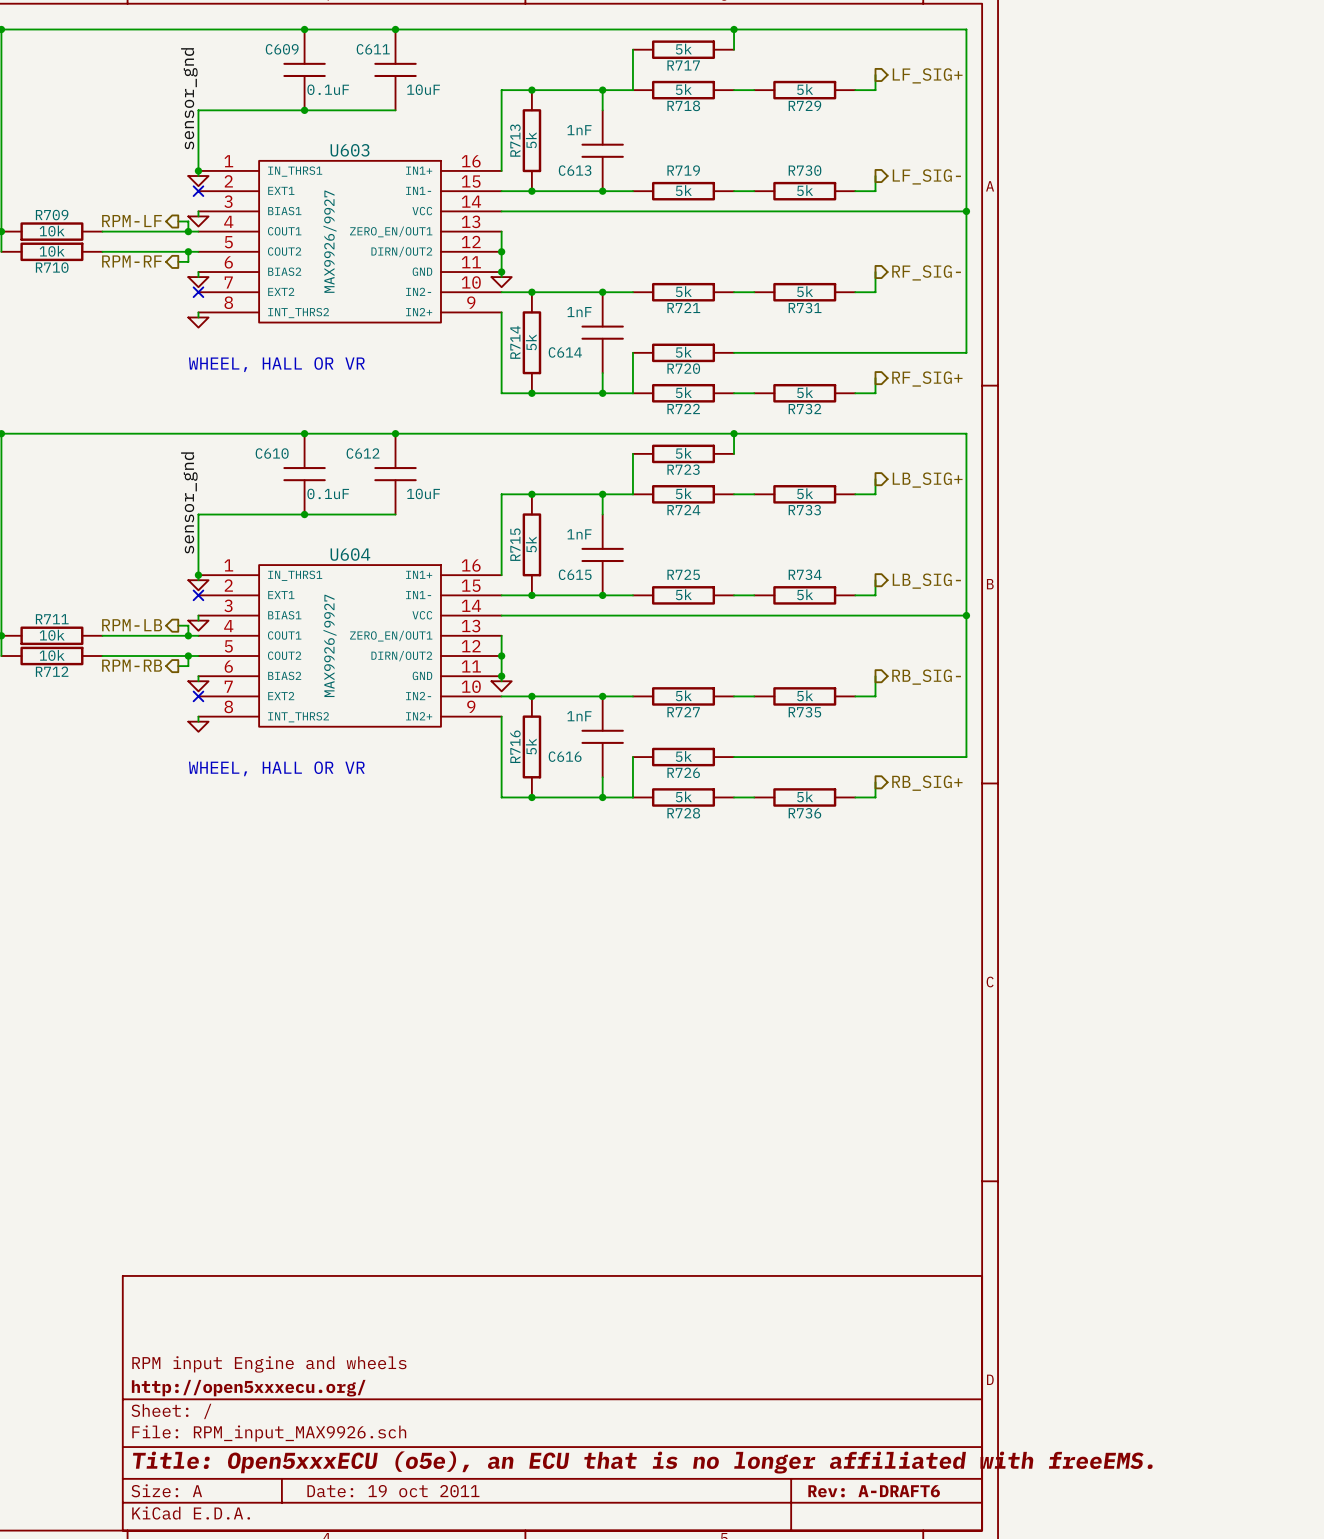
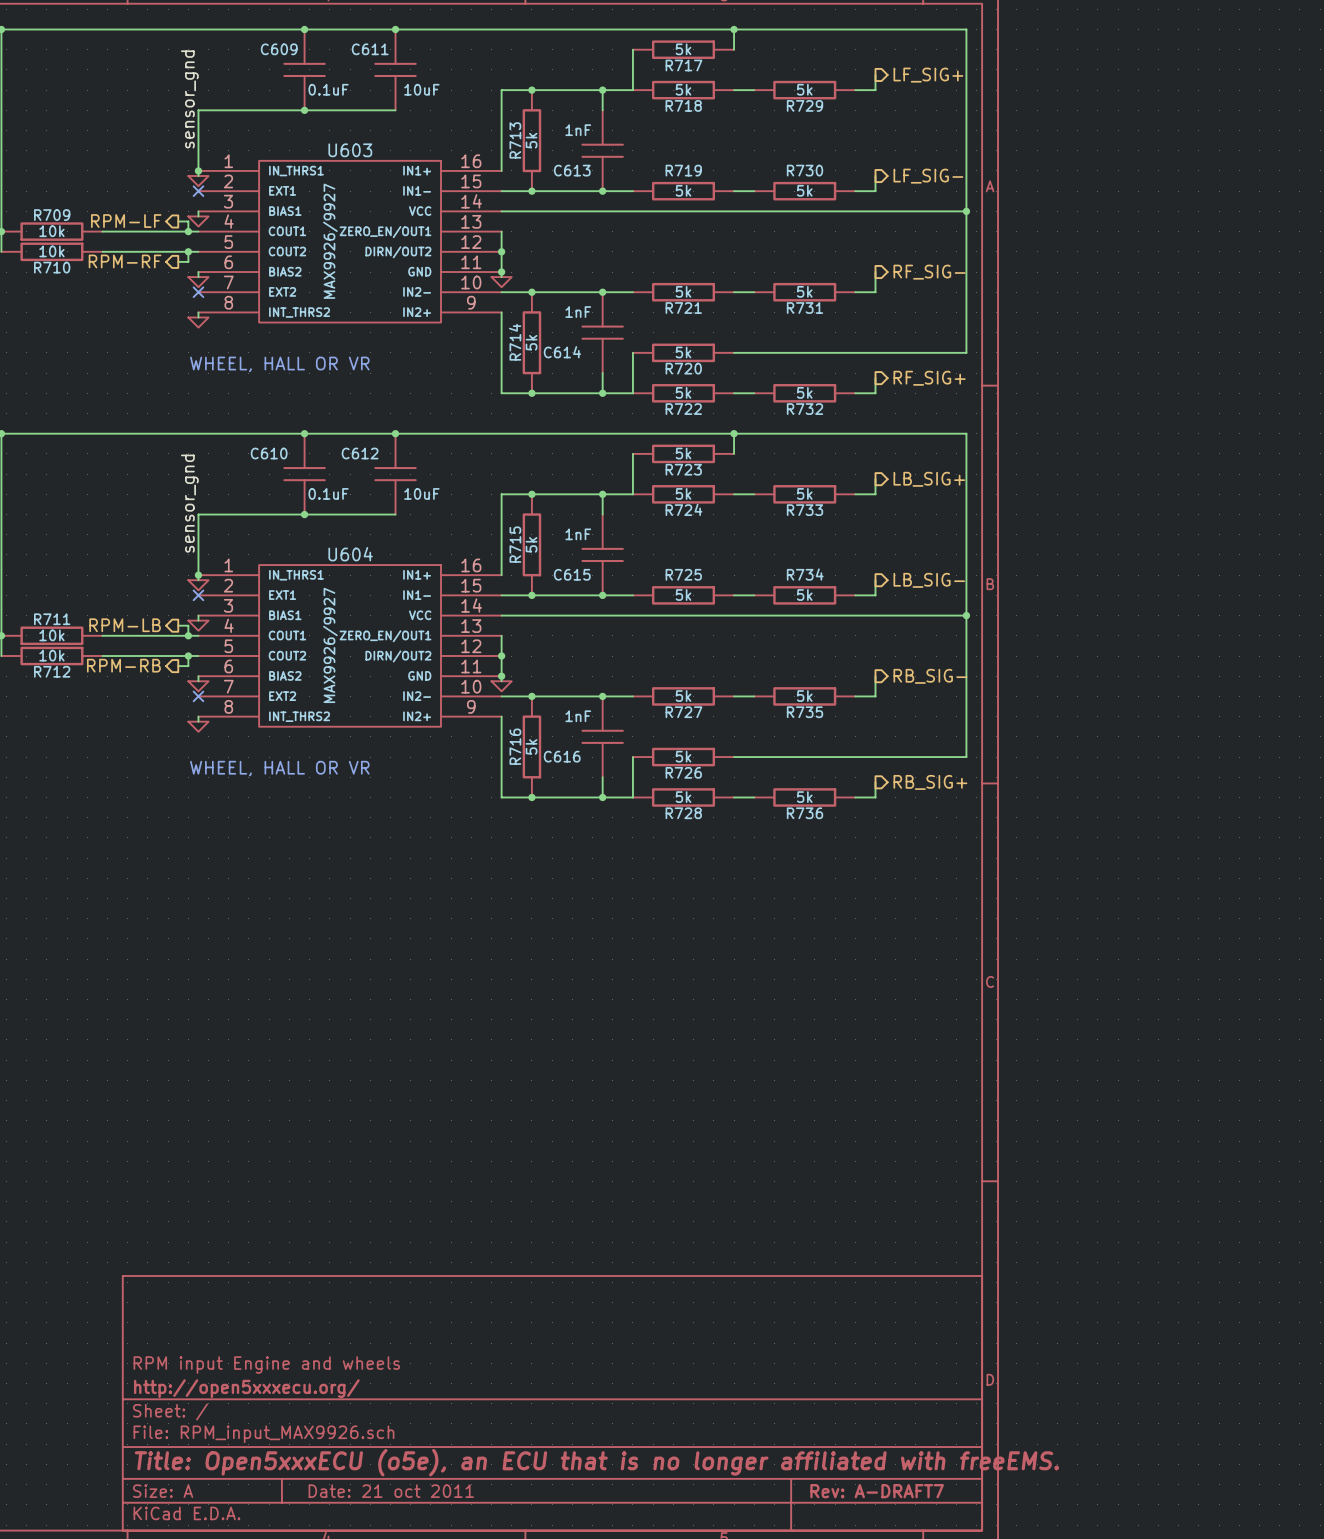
title block: Date: 19 oct 2011 (393, 1491) -> Date: 21 oct 2011 (391, 1491)
title block: Rev: A-DRAFT6 (874, 1491) -> Rev: A-DRAFT7 (877, 1491)

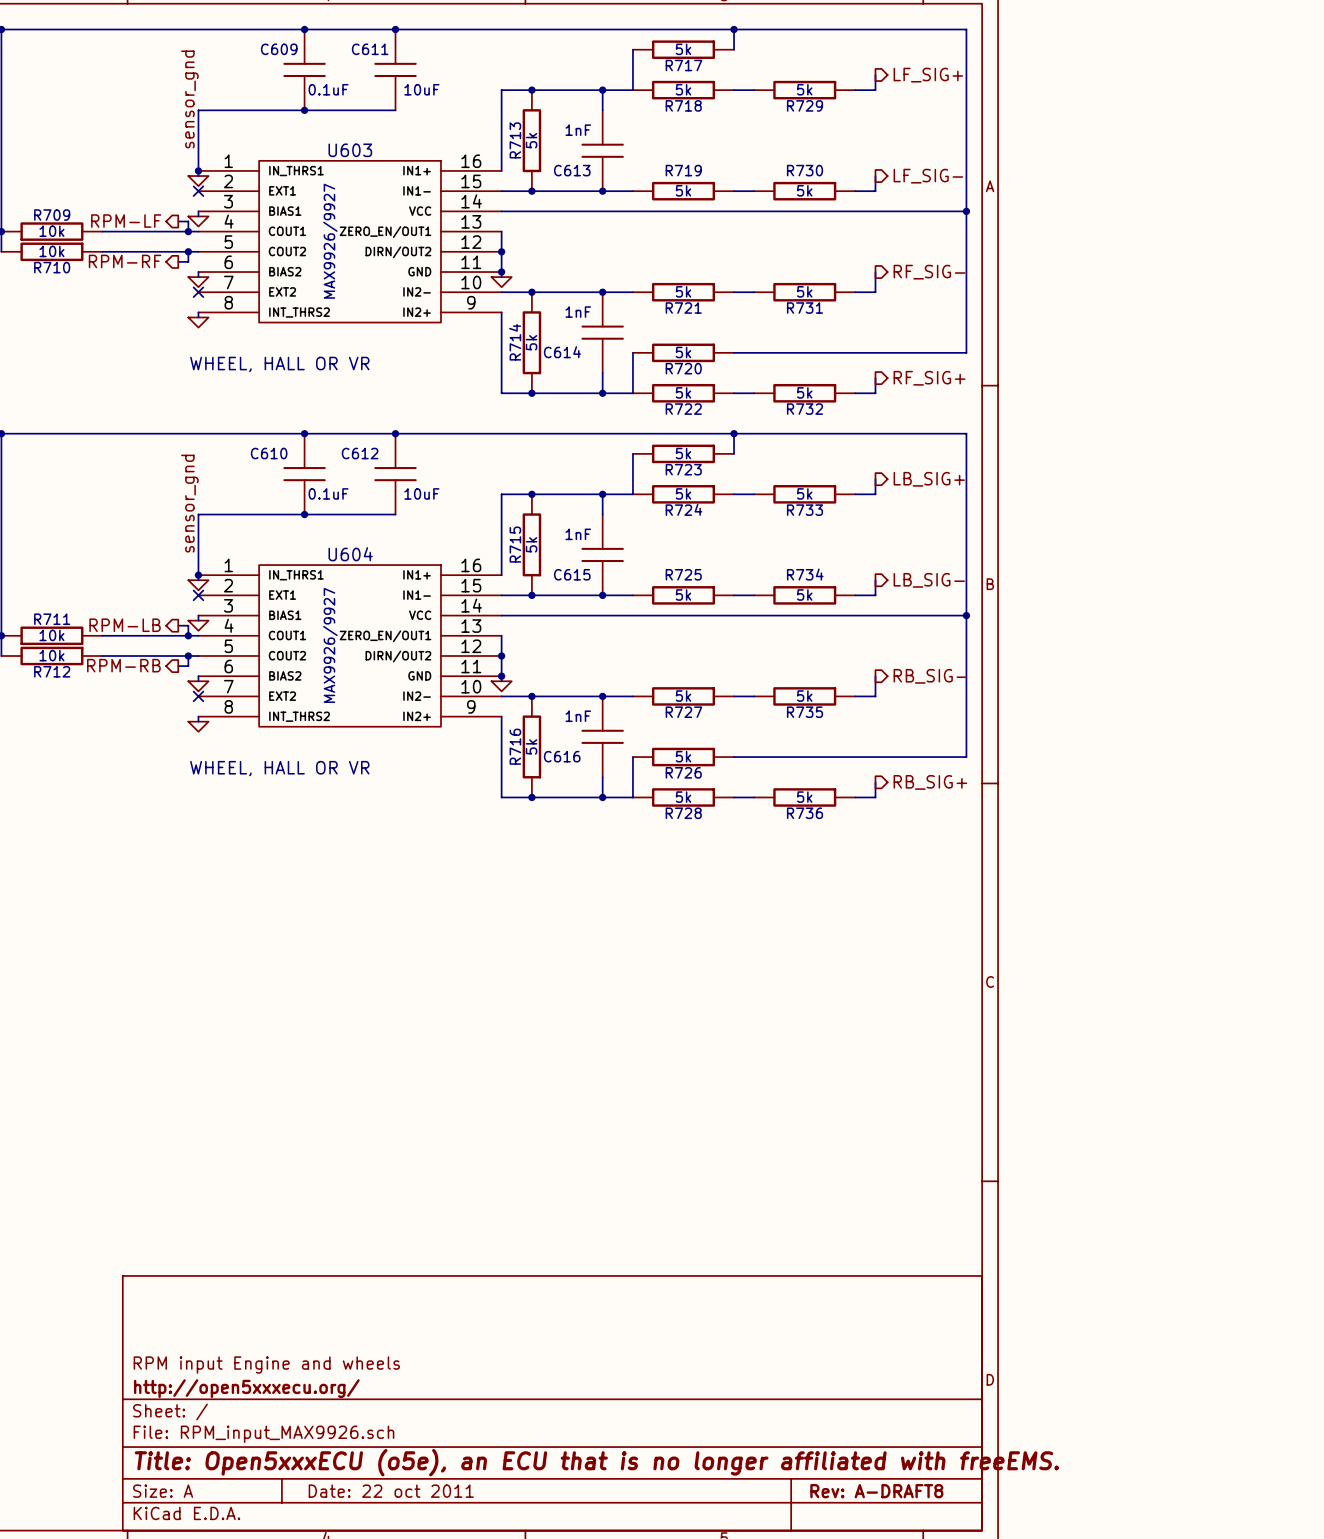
title block: Date: 21 oct 2011 (391, 1491) -> Date: 22 oct 2011 (391, 1491)
title block: Rev: A-DRAFT7 (877, 1491) -> Rev: A-DRAFT8 (876, 1491)

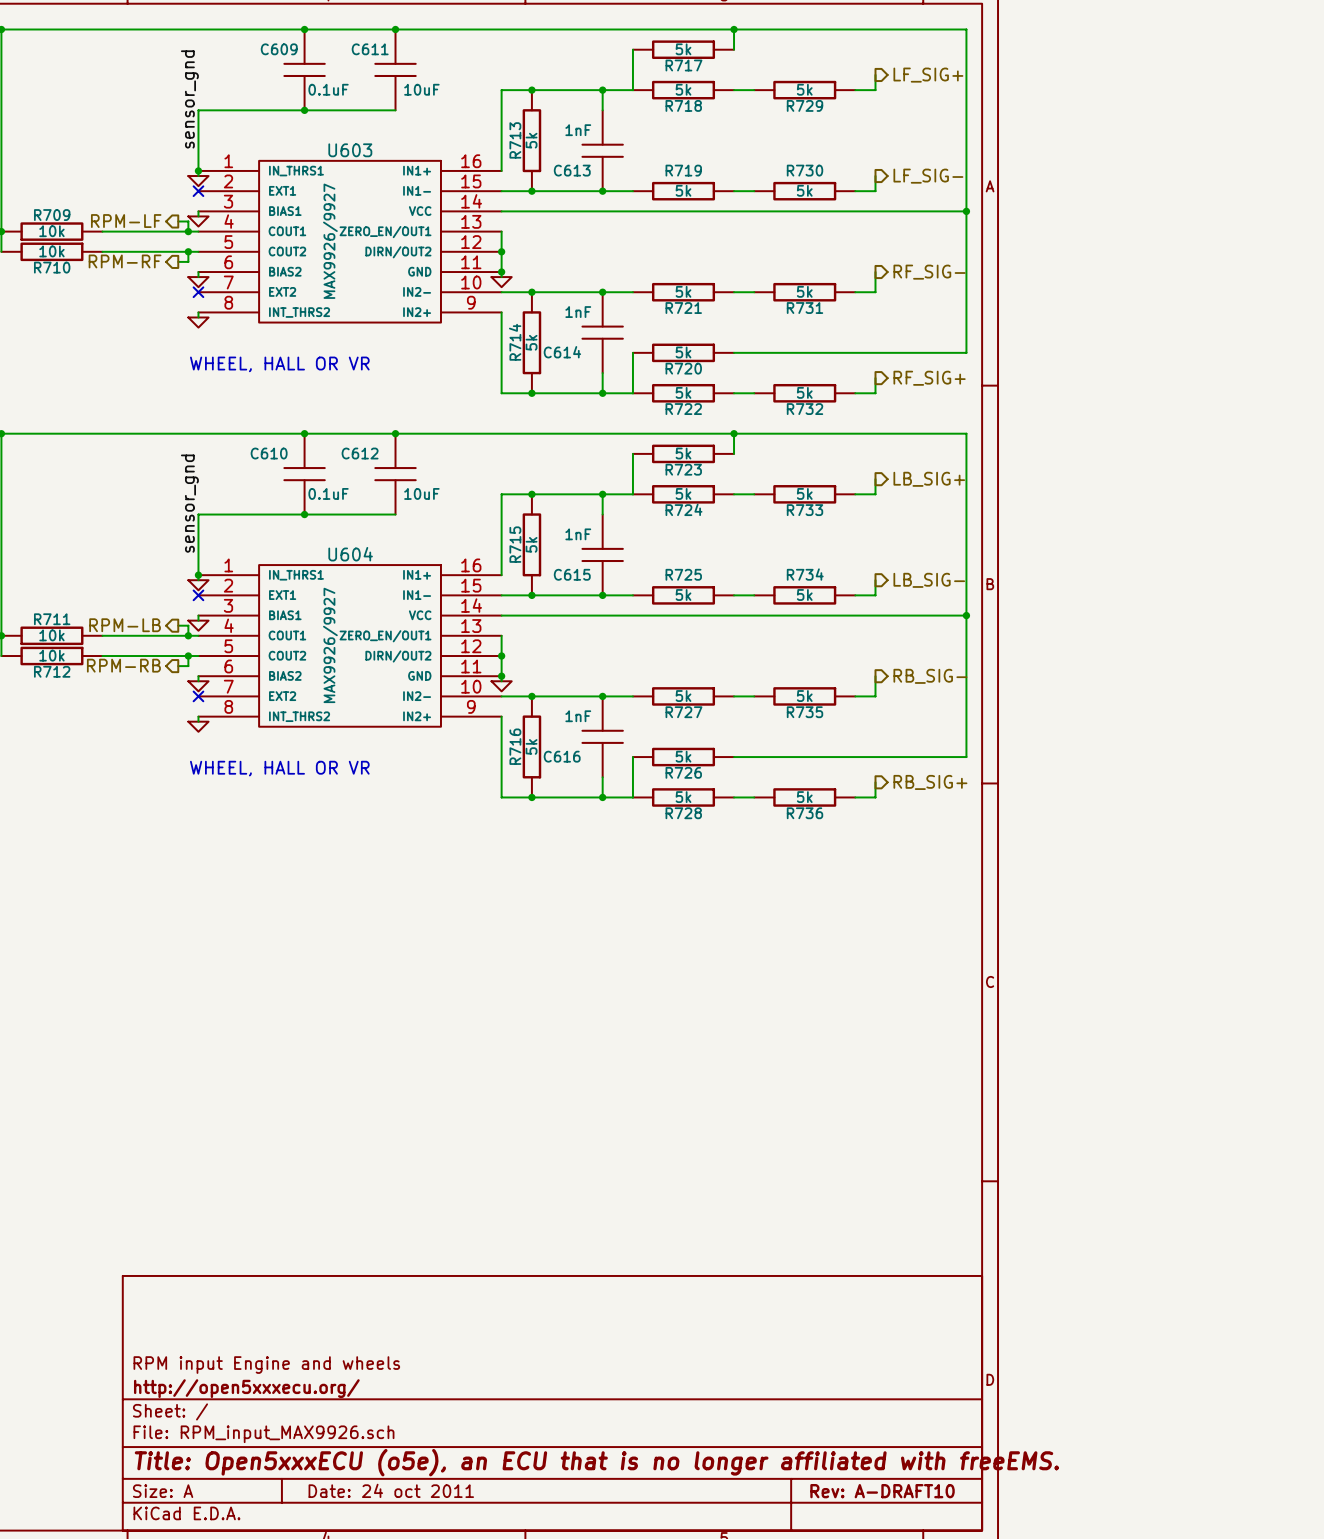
title block: Date: 22 oct 2011 (391, 1491) -> Date: 24 oct 2011 (391, 1490)
title block: Rev: A-DRAFT8 (876, 1491) -> Rev: A-DRAFT10 (882, 1491)

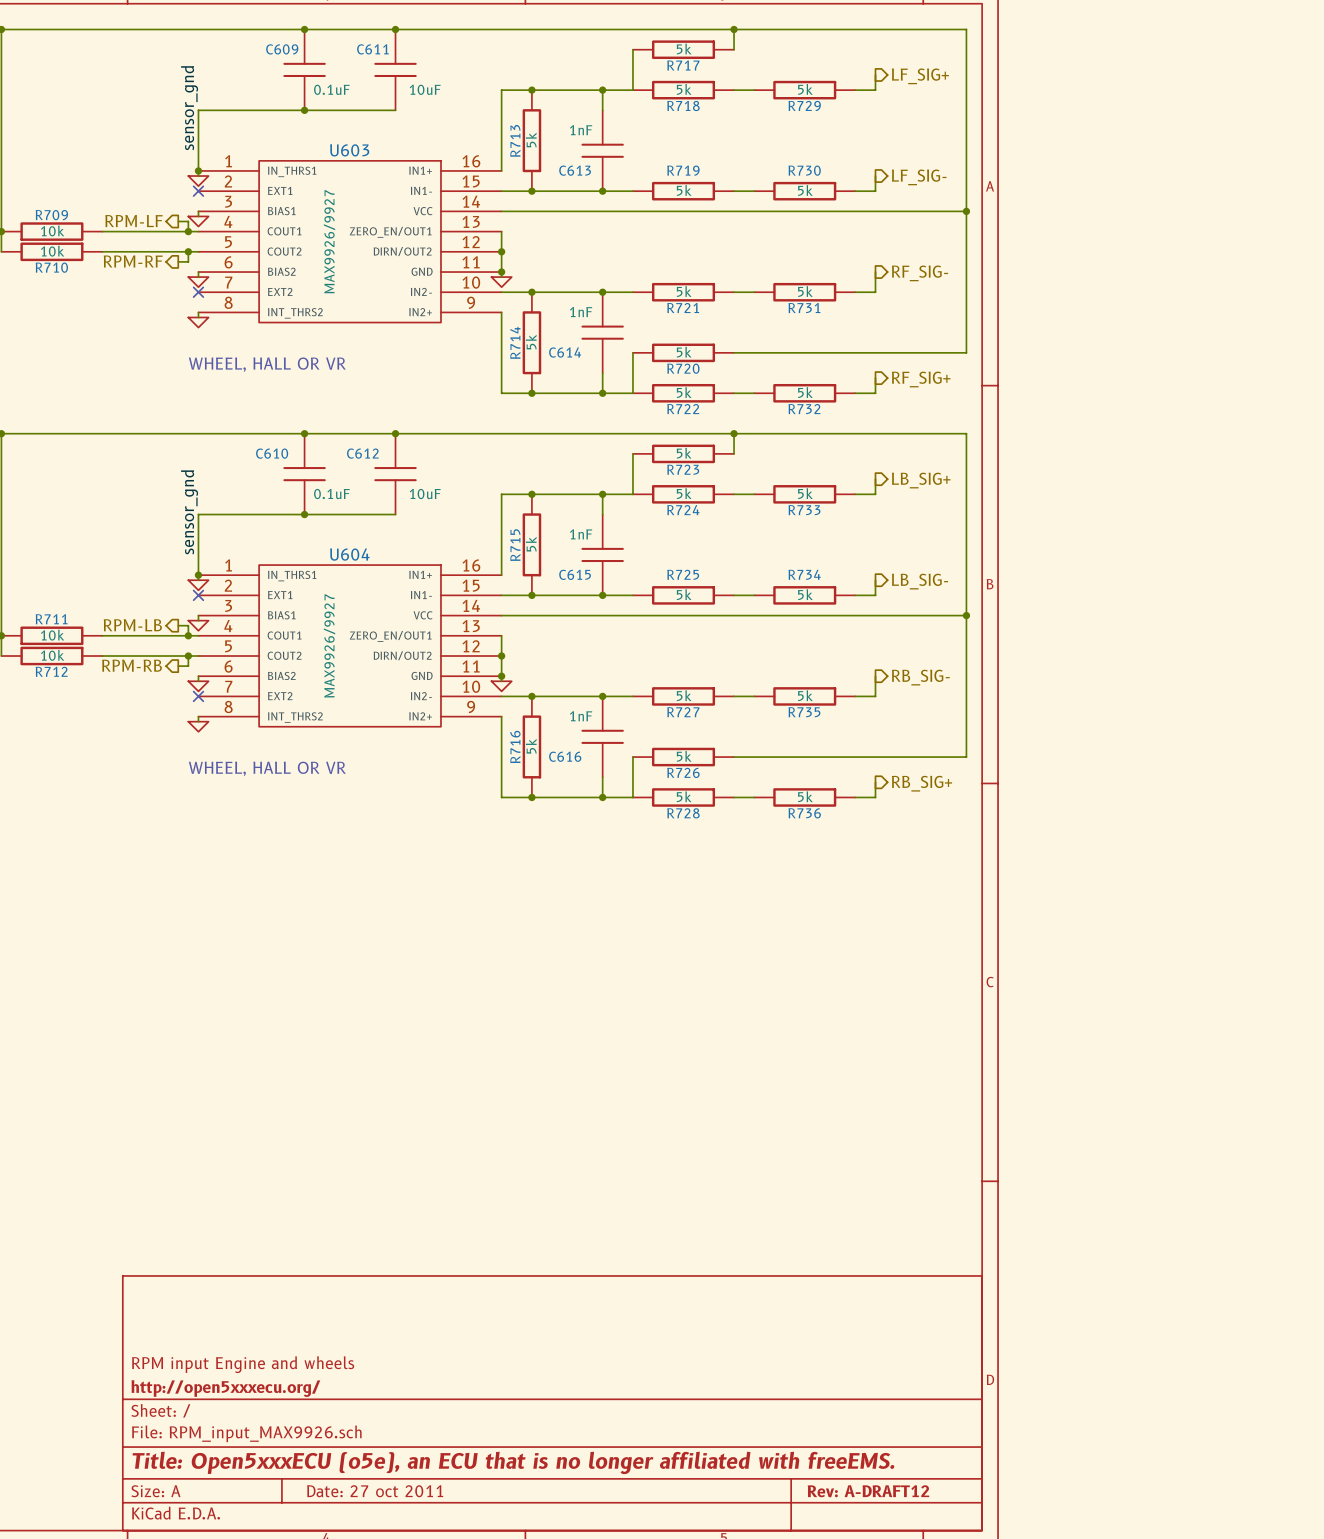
title block: Date: 24 oct 2011 (391, 1490) -> Date: 27 oct 2011 (375, 1491)
title block: Rev: A-DRAFT10 (882, 1491) -> Rev: A-DRAFT12 (868, 1491)

